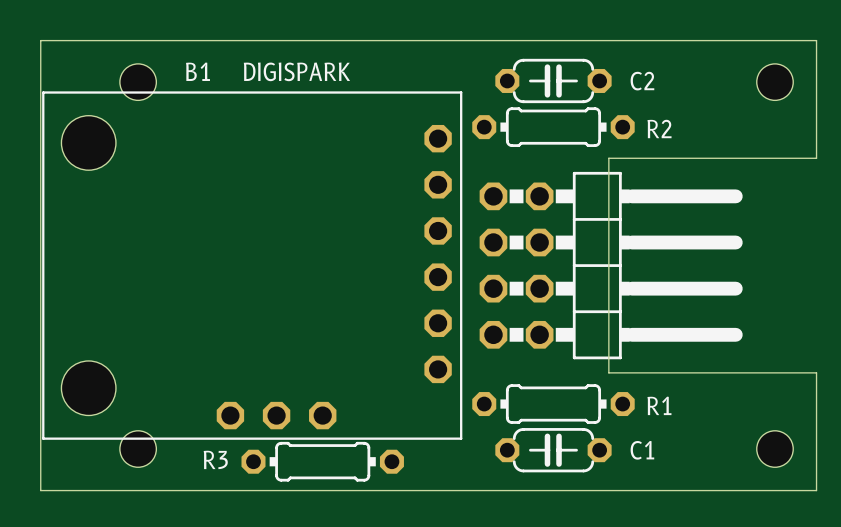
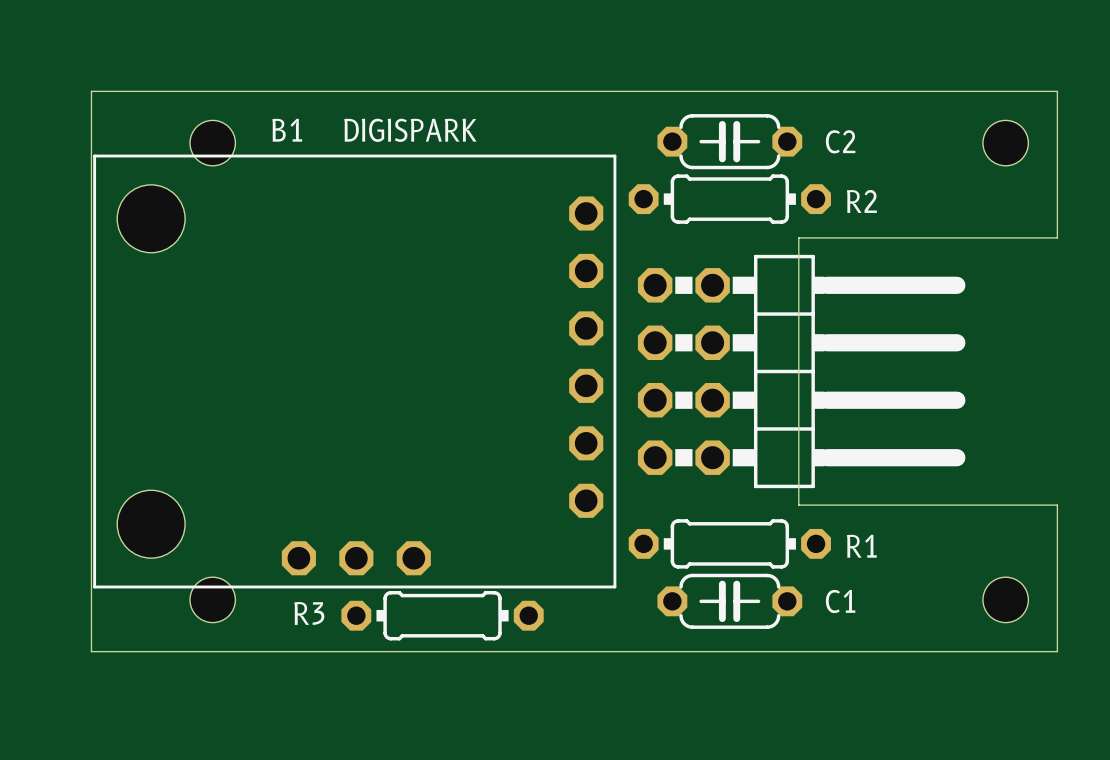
B1 footprint: [42, 91, 463, 440] -> [93, 154, 617, 589]

